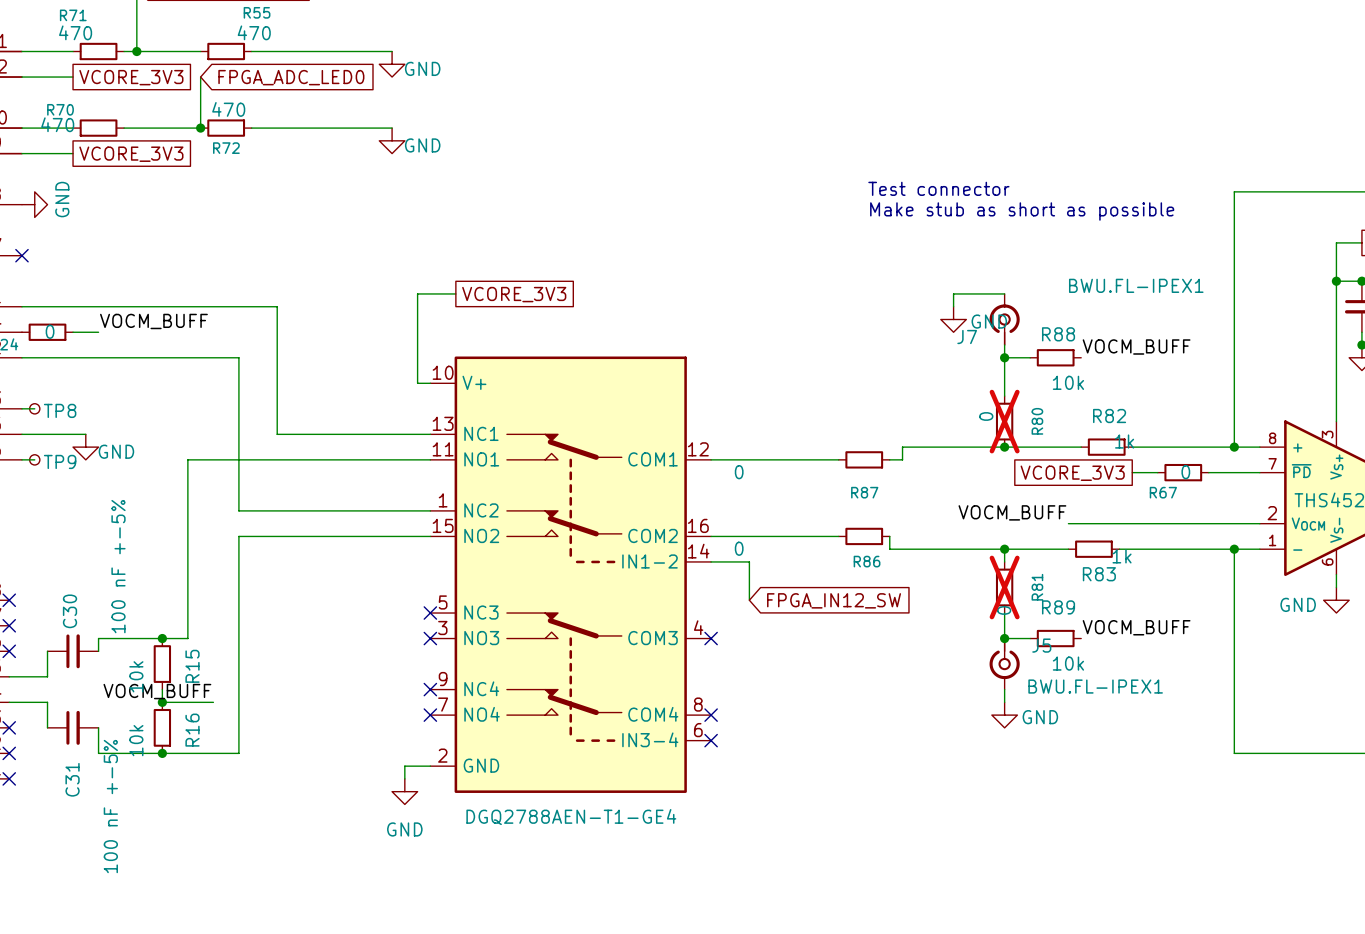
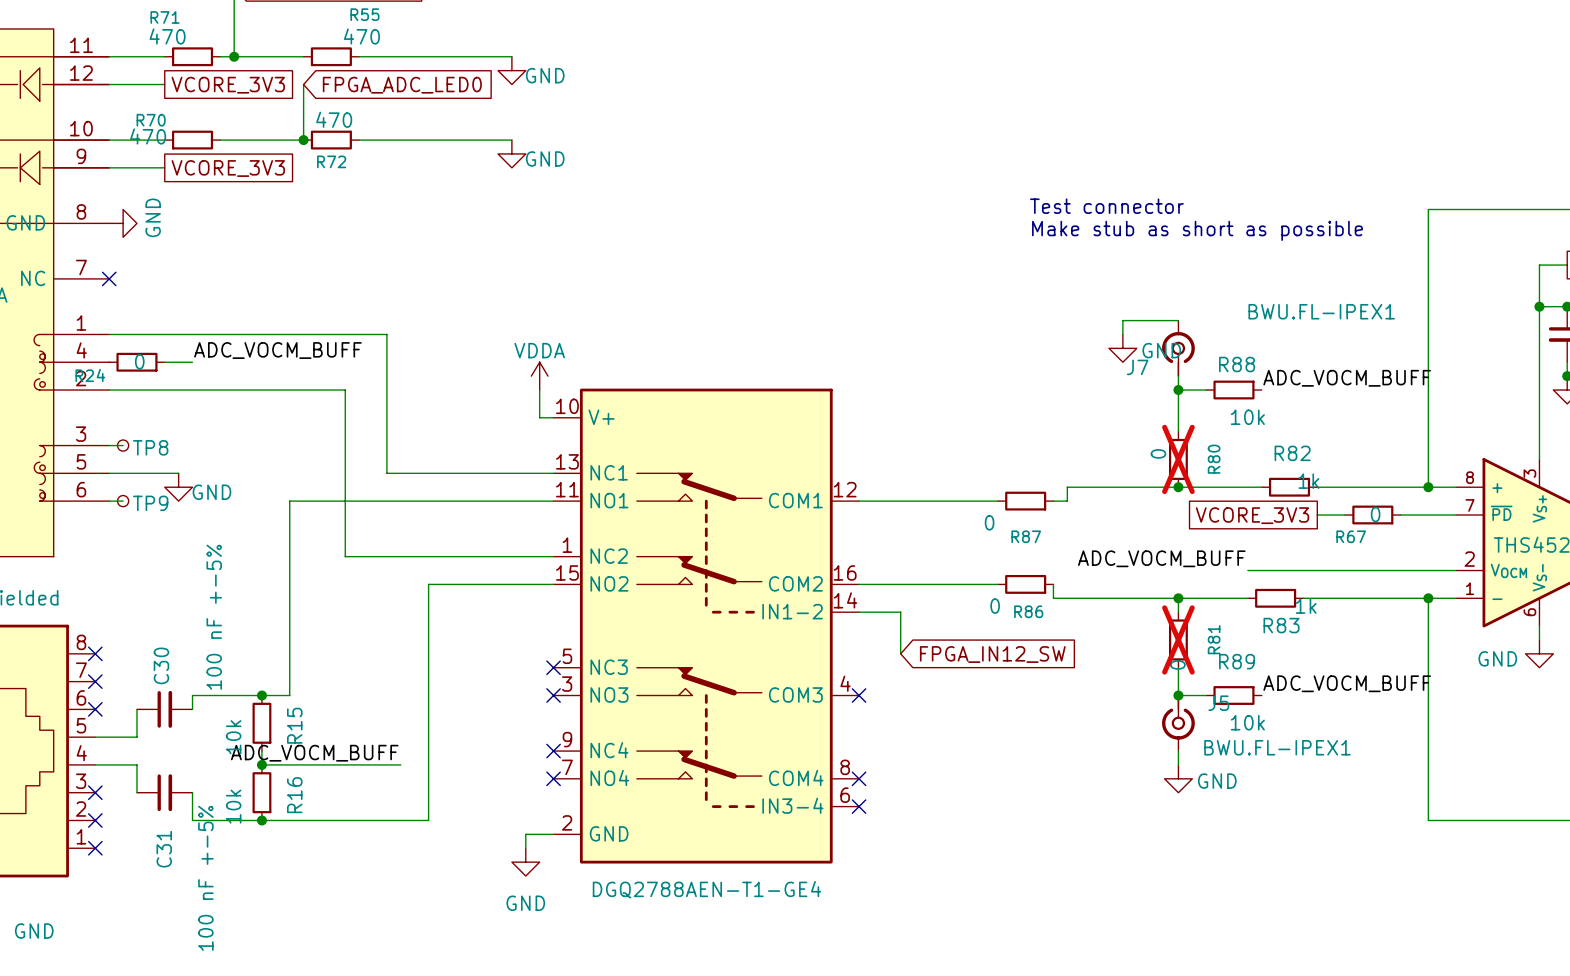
wire: (455, 293) (417, 293) (417, 357) -> none
global label: VCORE_3V3 (514, 294) -> none
label: VOCM_BUFF (153, 321) -> ADC_VOCM_BUFF (277, 350)
power symbol: none -> VDDA (539, 376)
label: VOCM_BUFF (1136, 347) -> ADC_VOCM_BUFF (1347, 378)
R87 value position: 0 (739, 472) -> 0 (989, 522)
label: VOCM_BUFF (1012, 512) -> ADC_VOCM_BUFF (1161, 558)
wire: (315, 536) (238, 536) (238, 753) -> (428, 584) (428, 820) (345, 820)
R86 value position: 0 (739, 548) -> 0 (995, 606)
label: VOCM_BUFF (1136, 627) -> ADC_VOCM_BUFF (1347, 683)
label: VOCM_BUFF (157, 691) -> ADC_VOCM_BUFF (314, 753)
wire: none -> (317, 764) (400, 764)

